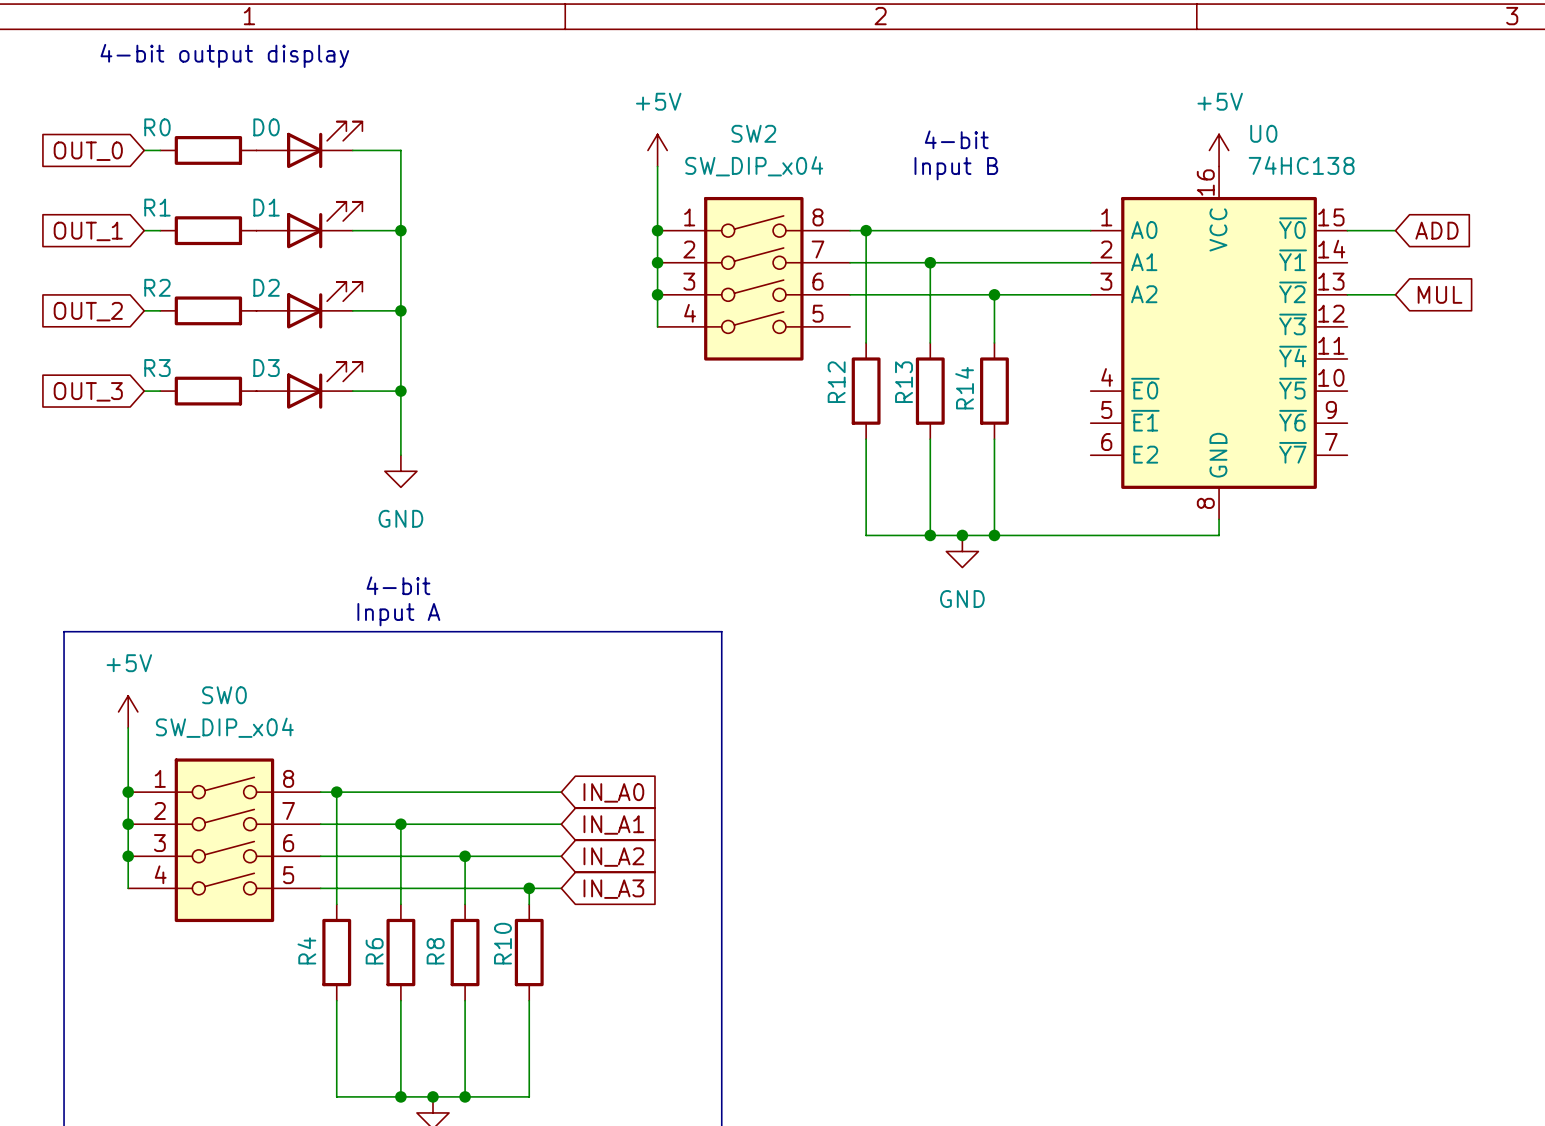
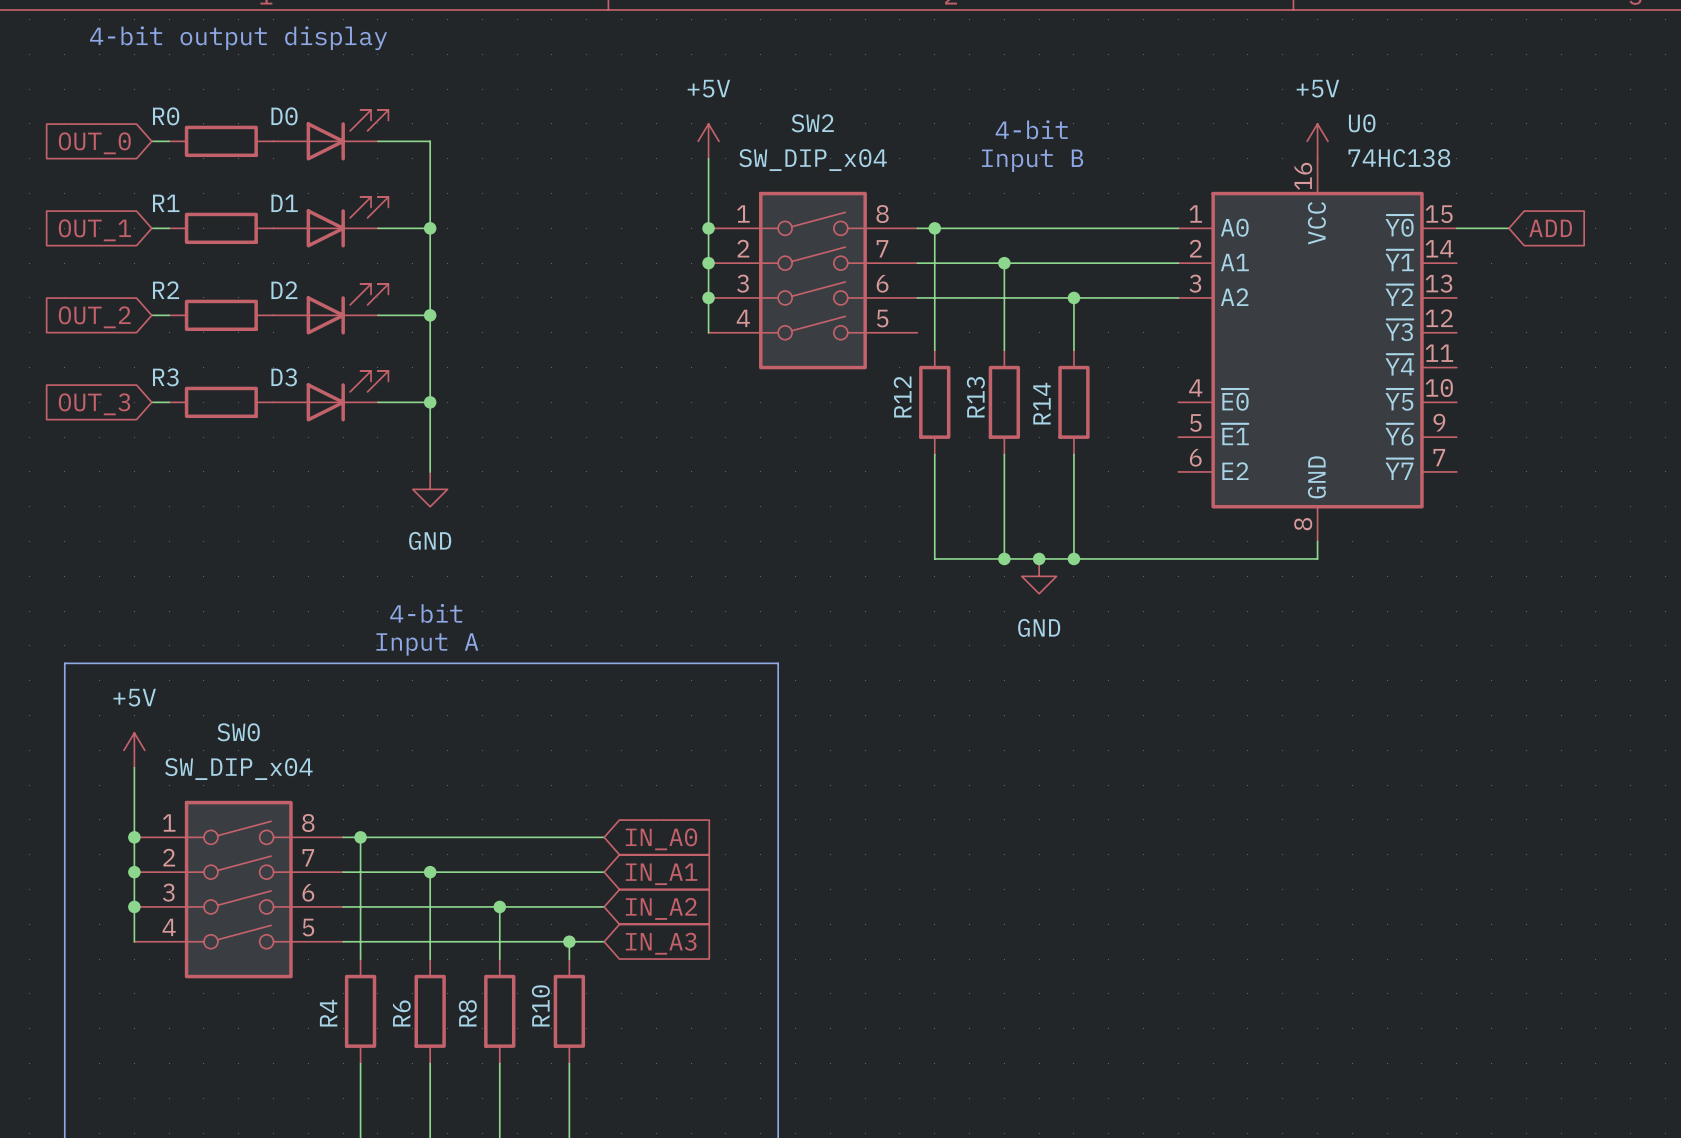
wire: (1347, 294) (1395, 294) -> none
global label: MUL (1440, 294) -> none

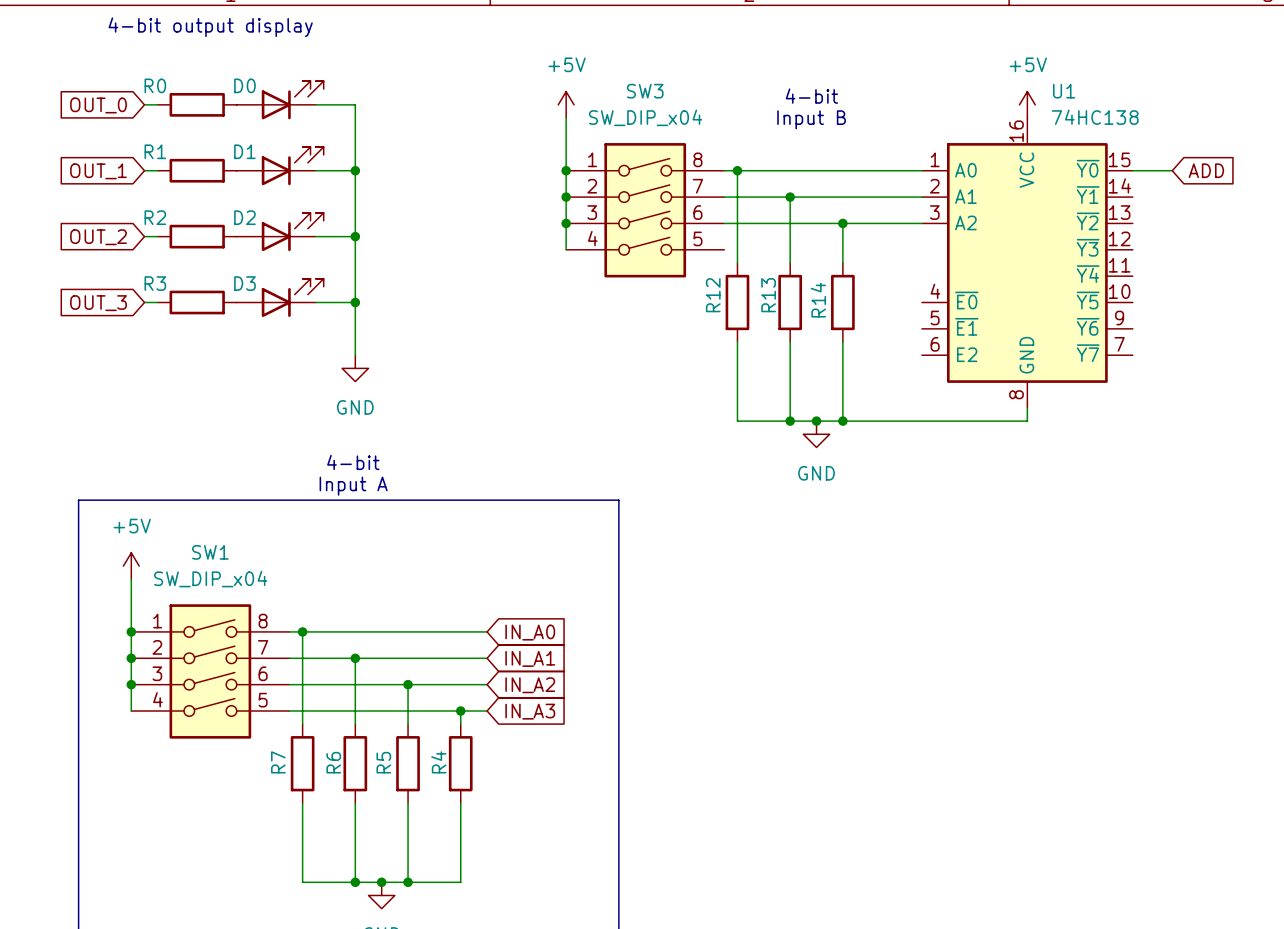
SW2 name: SW2 (812, 123) -> SW3 (645, 91)
U0 name: U0 (1362, 123) -> U1 (1064, 91)
SW0 name: SW0 (238, 732) -> SW1 (210, 552)
R10 name: R10 (540, 1005) -> R4 (438, 762)
R4 name: R4 (328, 1013) -> R7 (278, 762)
R8 name: R8 (467, 1013) -> R5 (383, 762)

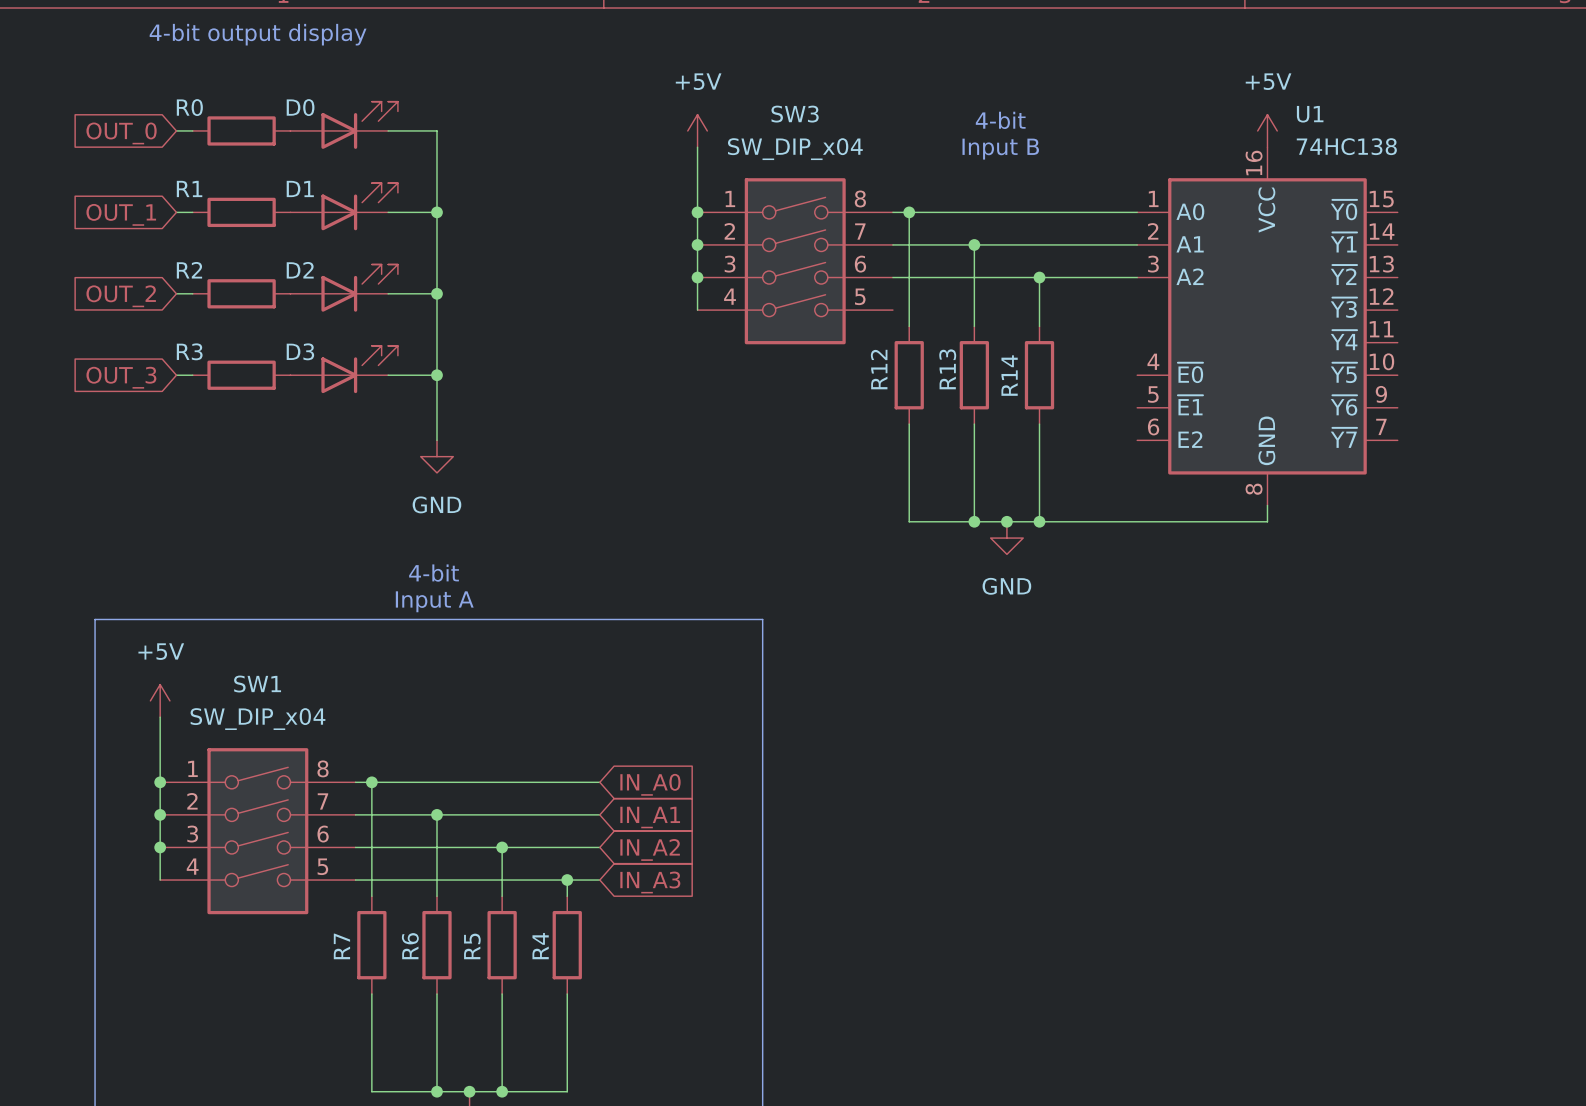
wire: (1132, 170) (1172, 170) -> none
global label: ADD (1206, 170) -> none

